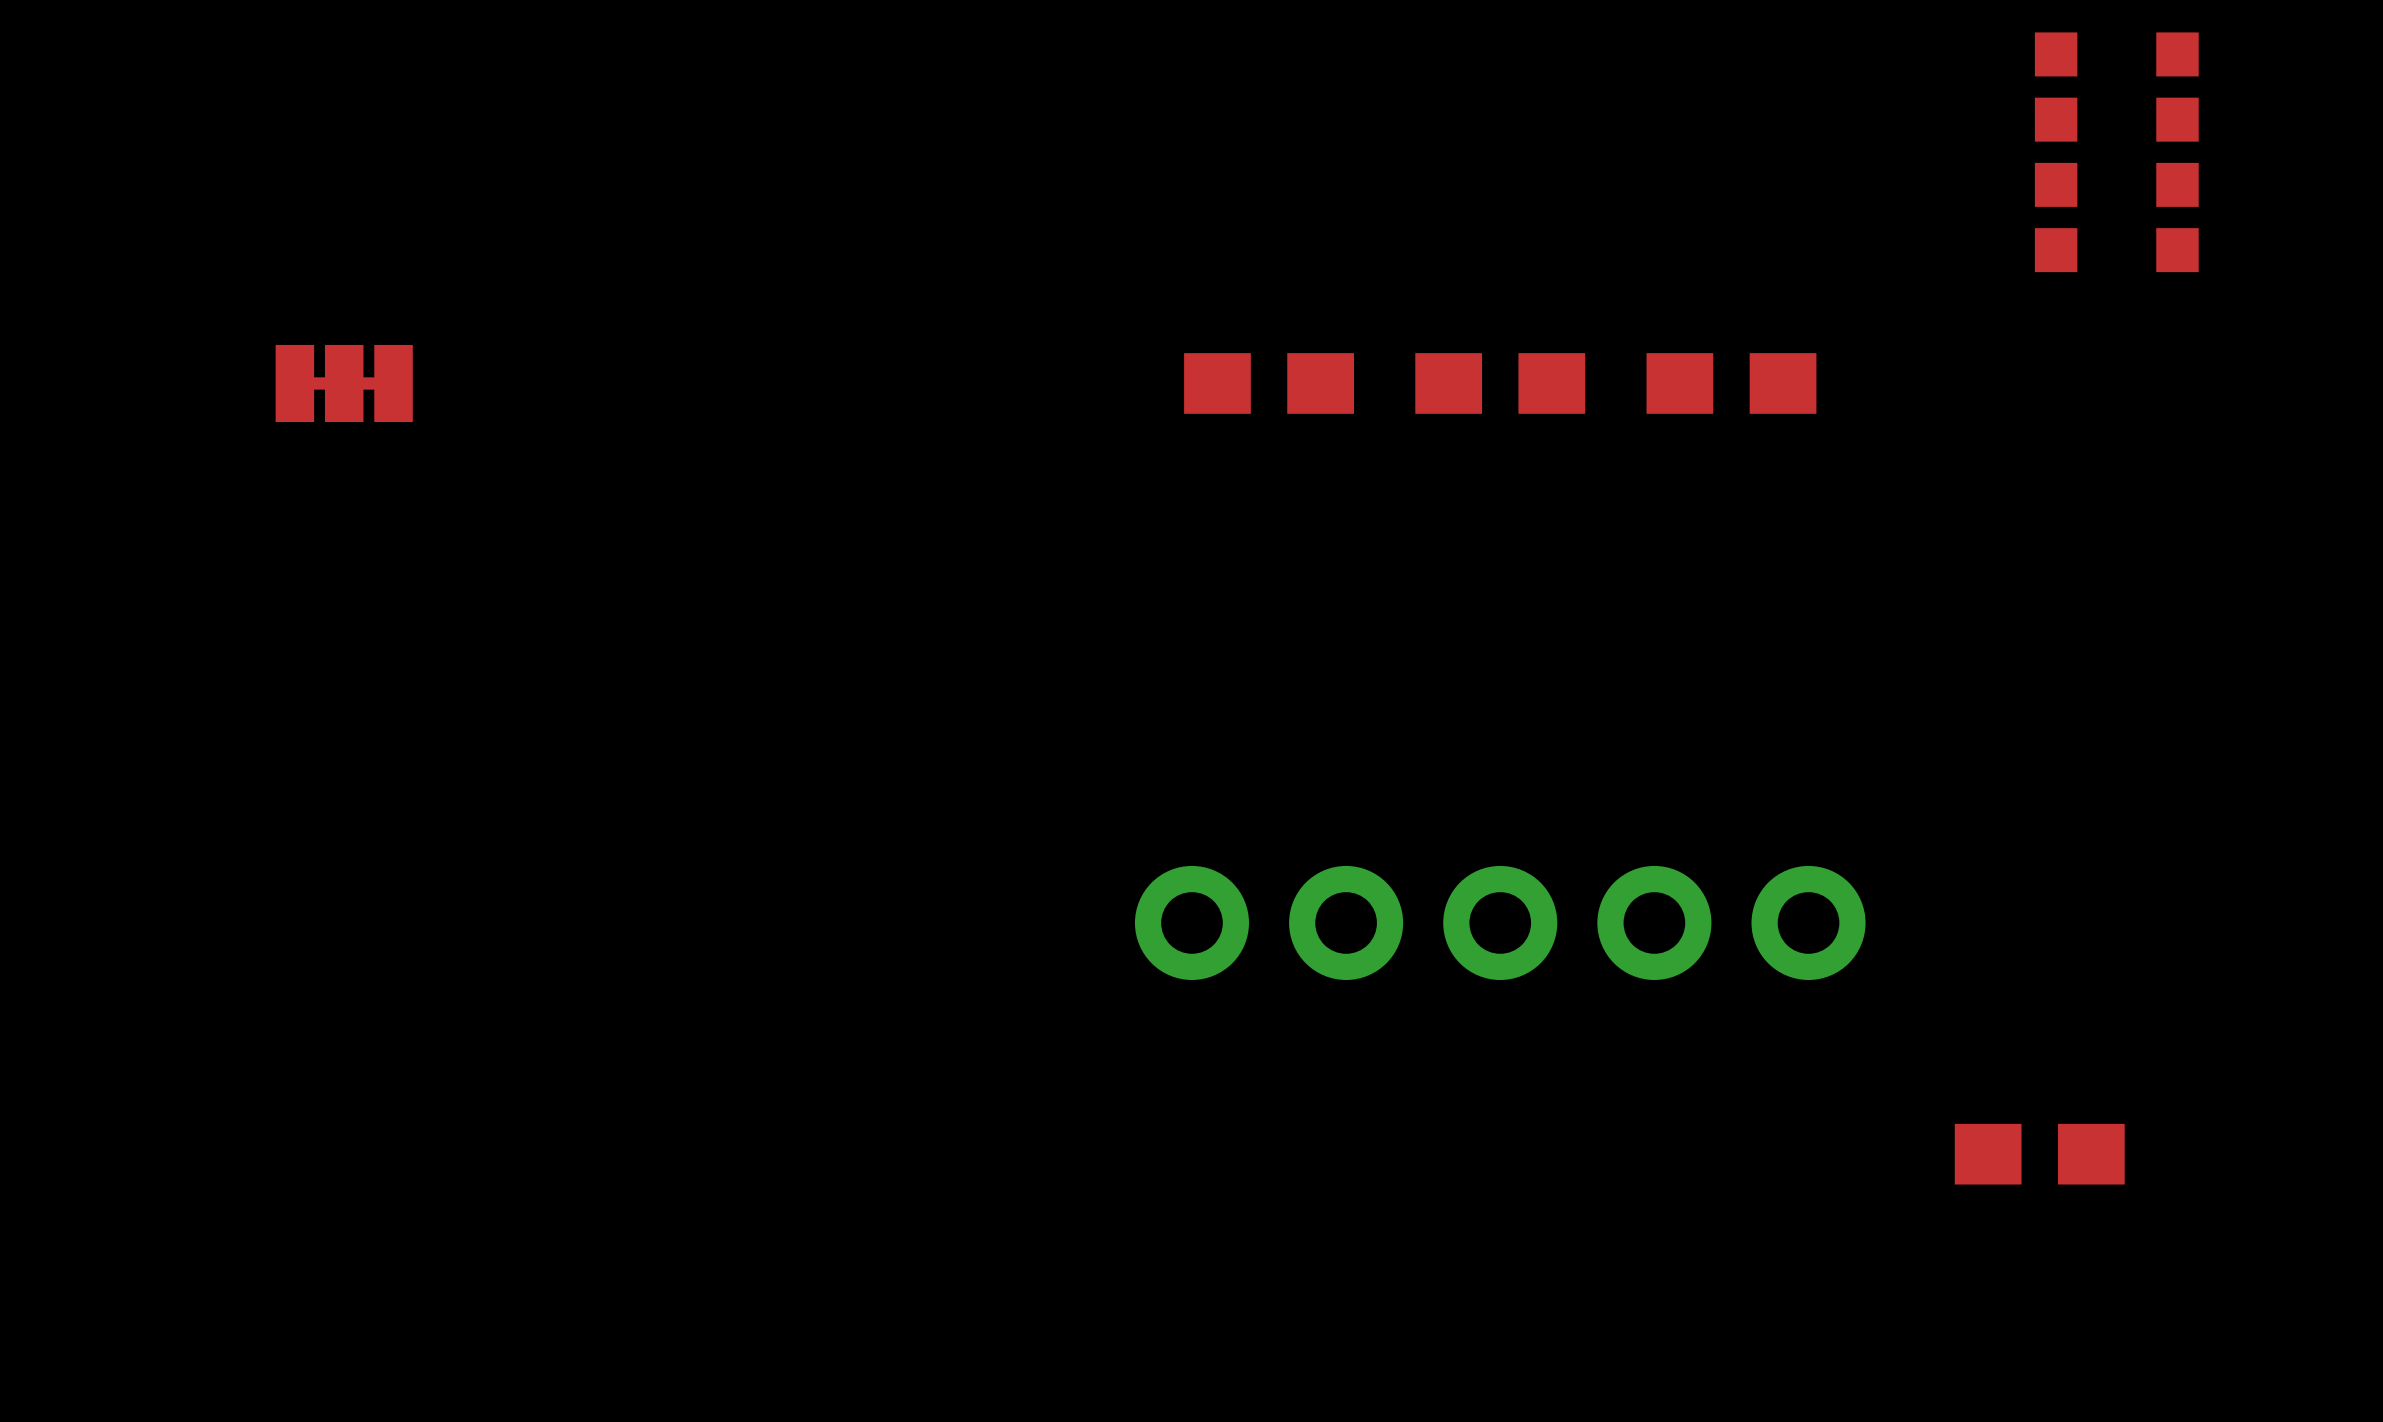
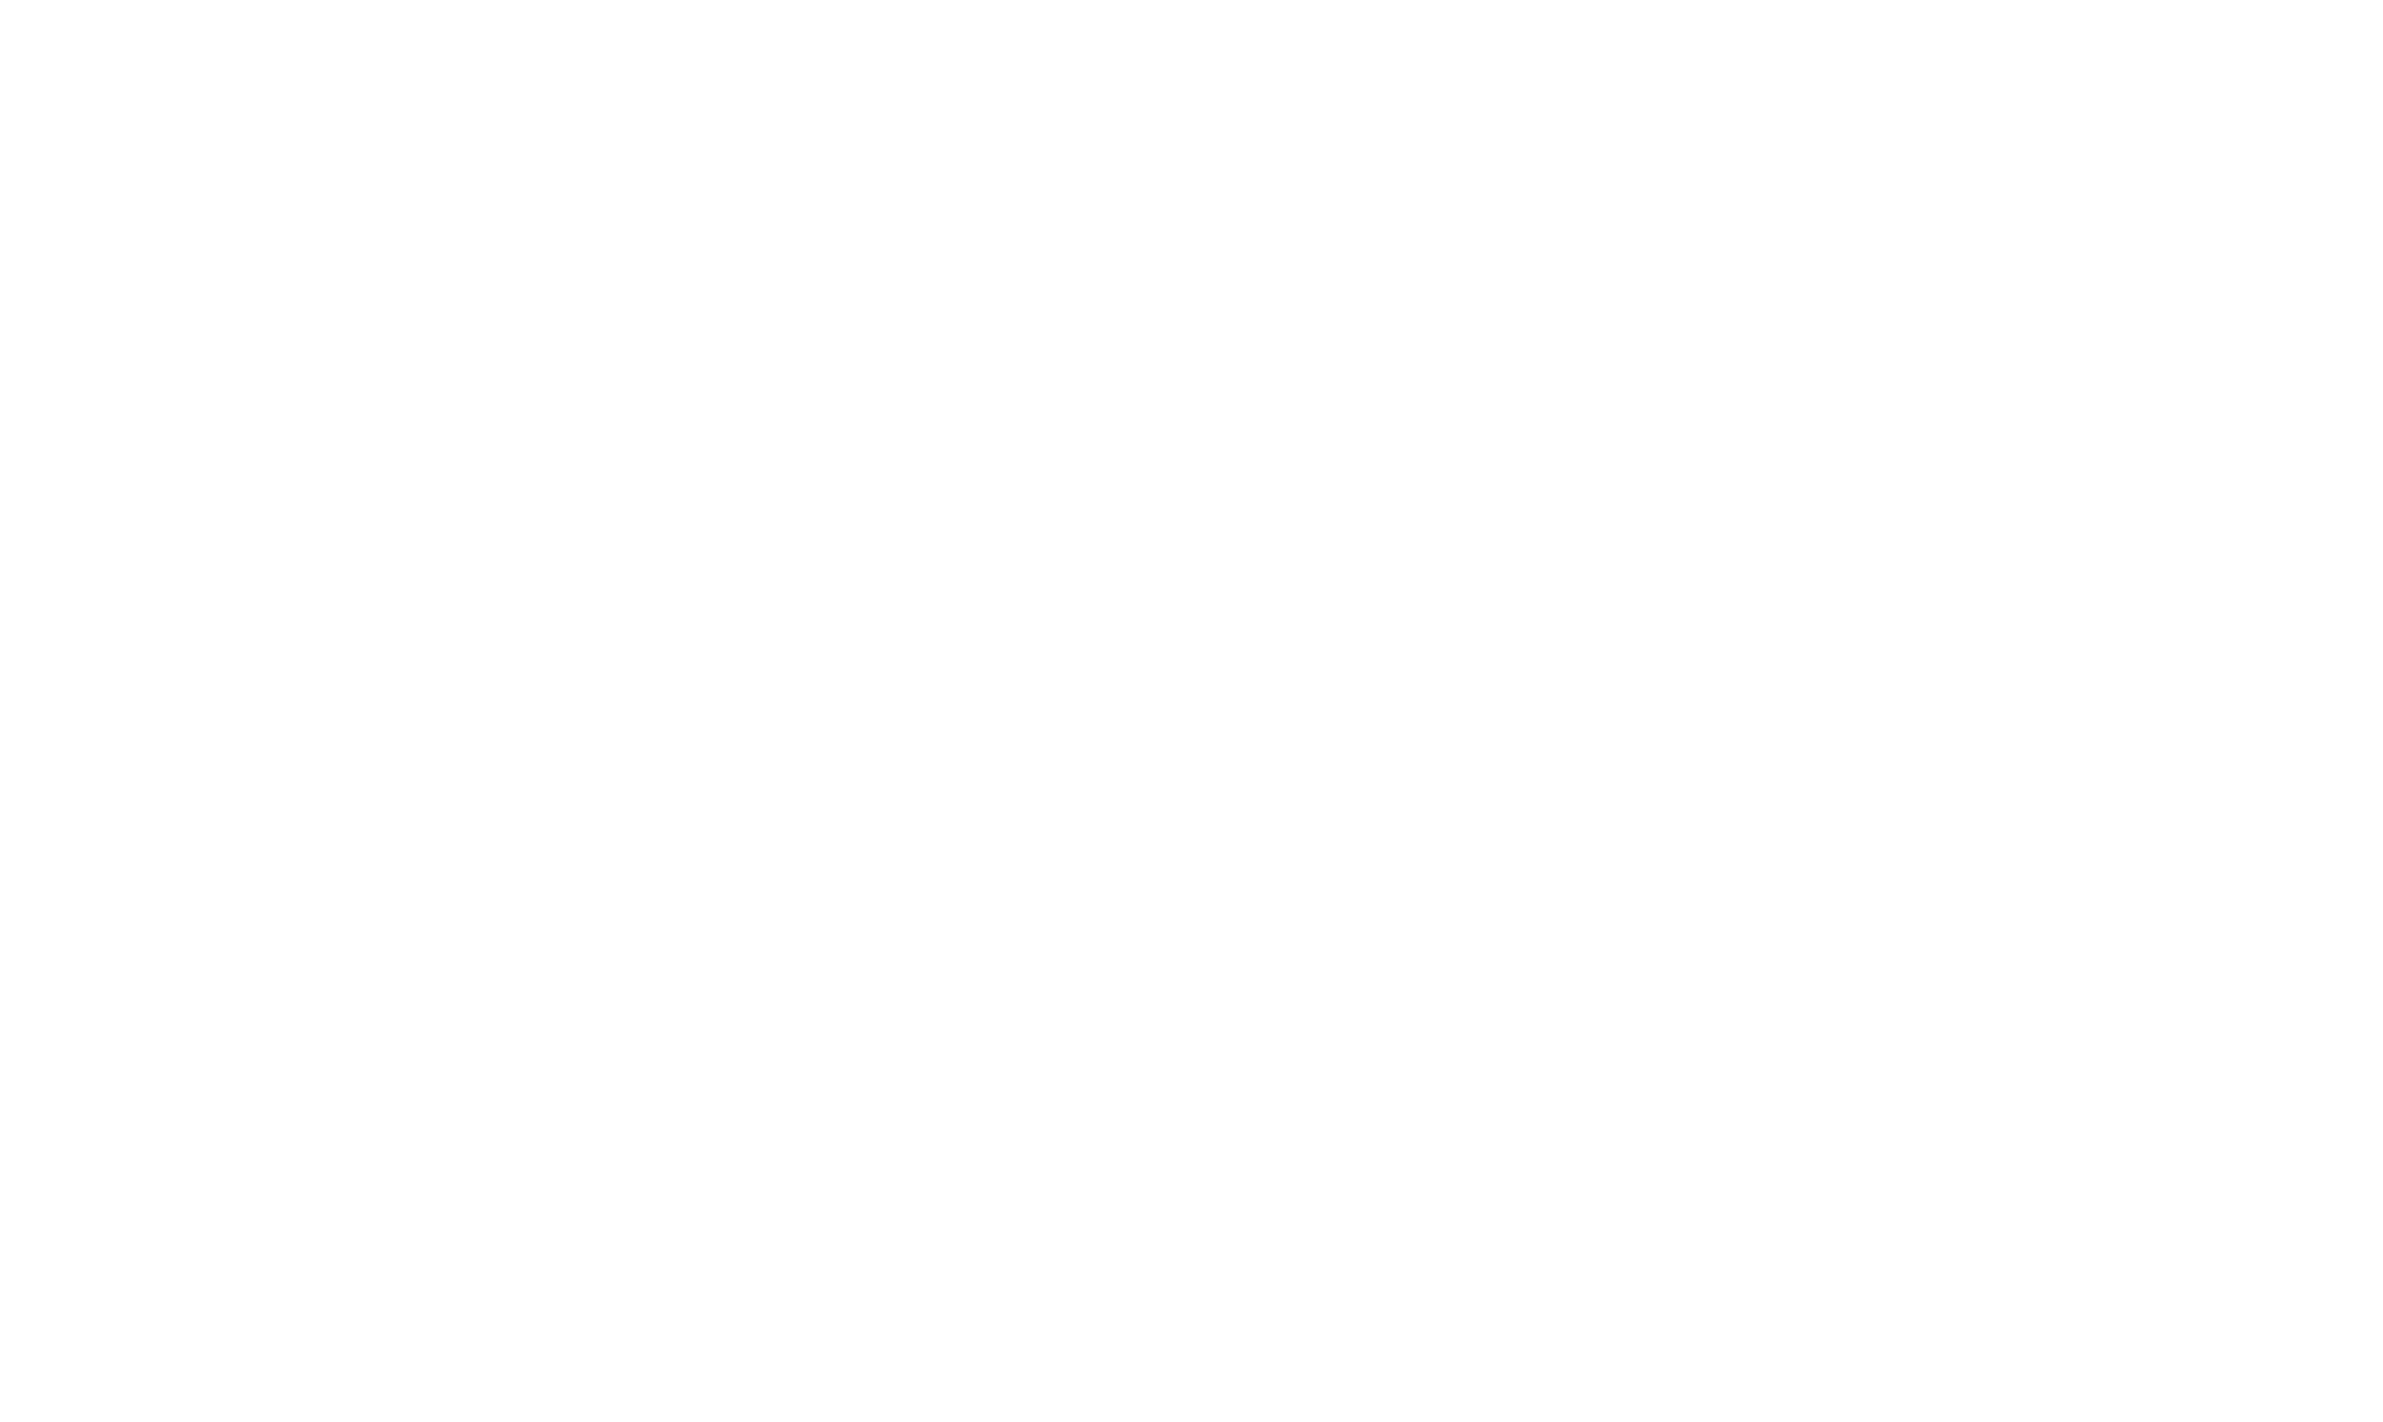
part: (2116, 152) -> none
part: (344, 383) -> none
part: (1269, 383) -> none
part: (1500, 383) -> none
part: (1731, 383) -> none
part: (1500, 922) -> none
part: (2039, 1154) -> none

